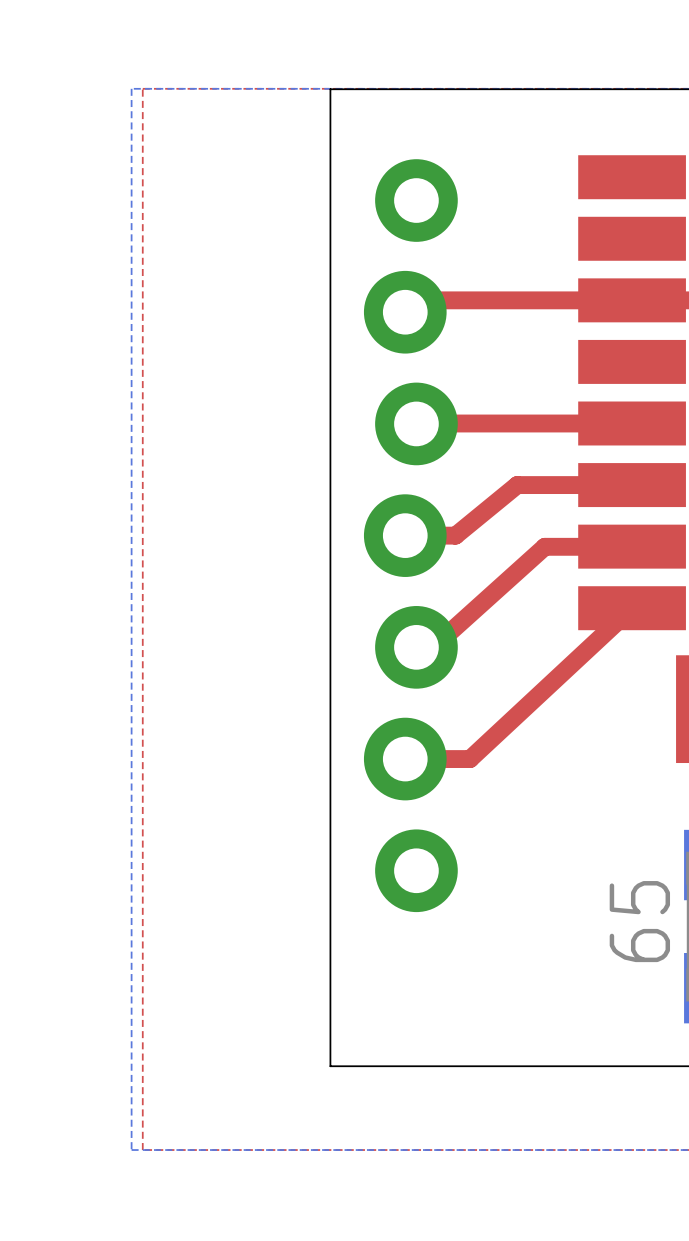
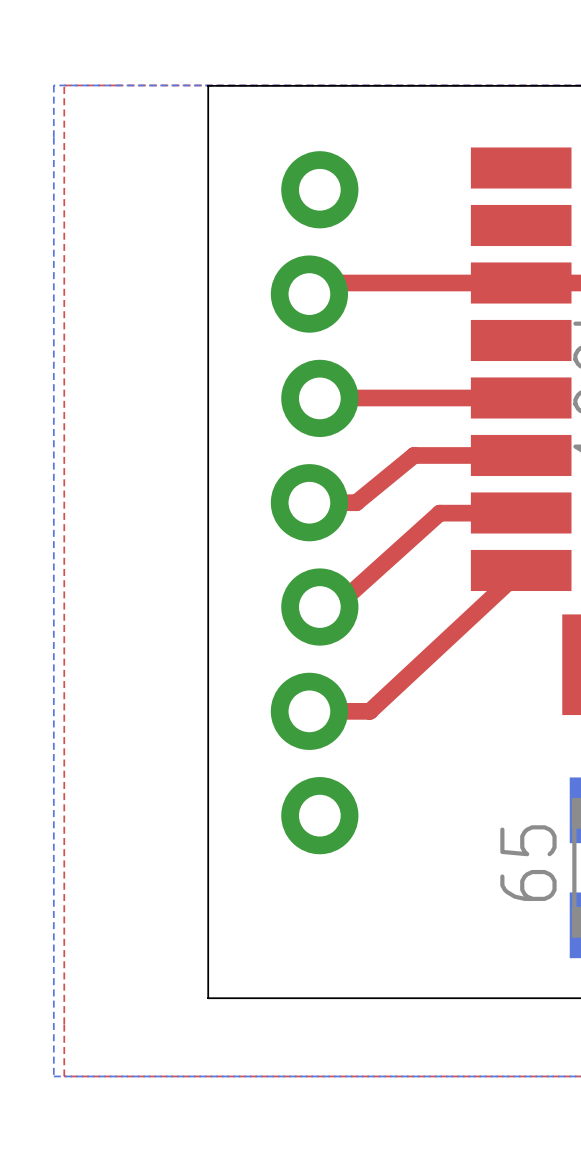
board edge: (330, 89) (330, 1066) -> (239, 85) (208, 85) (208, 998) (239, 998)

